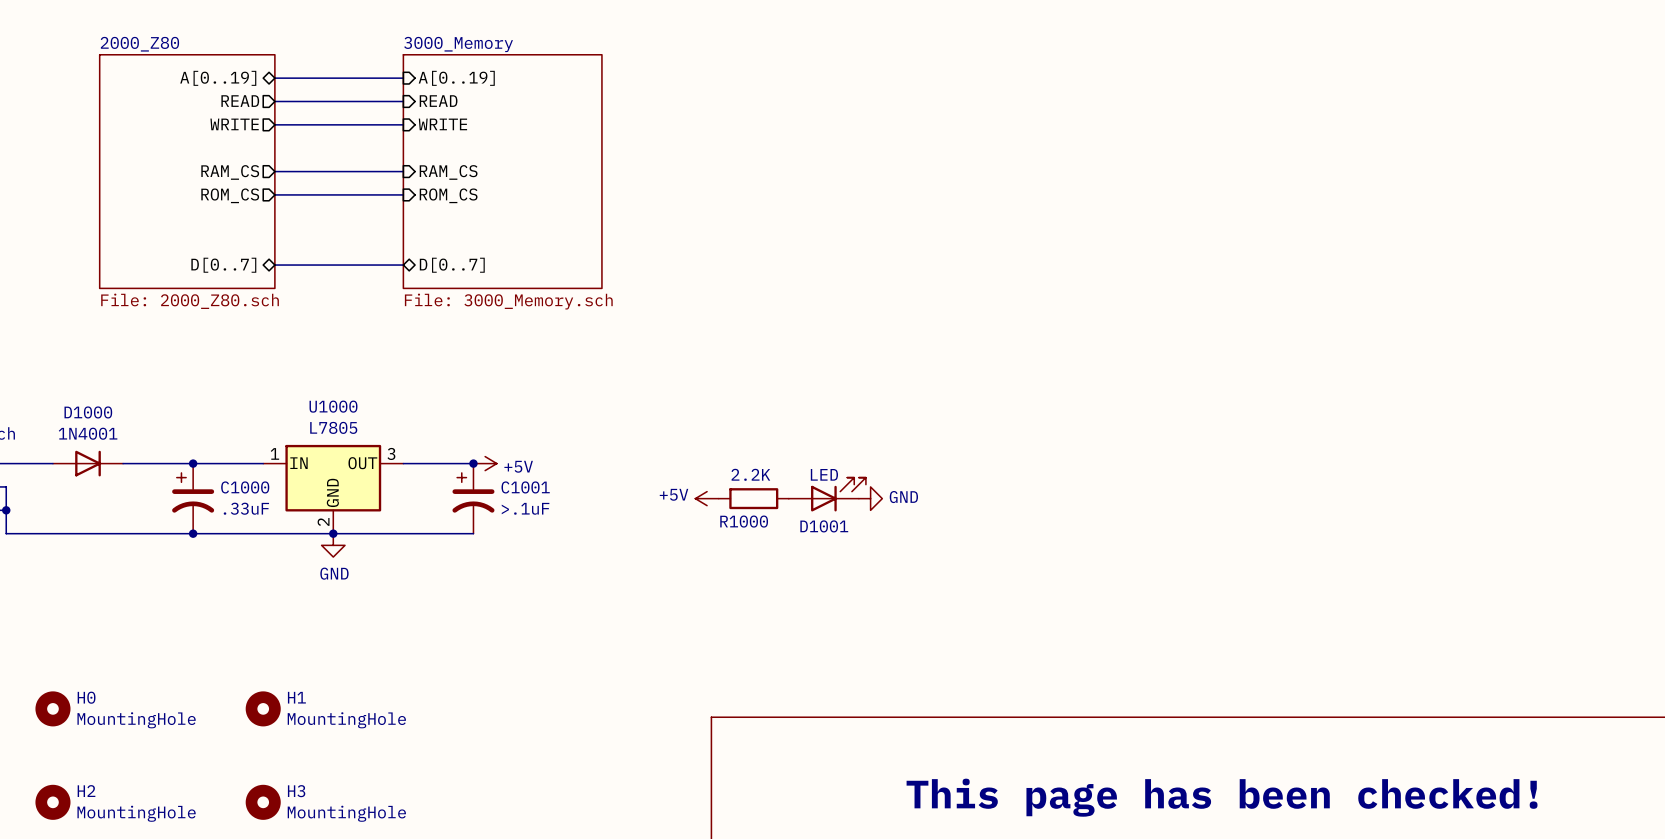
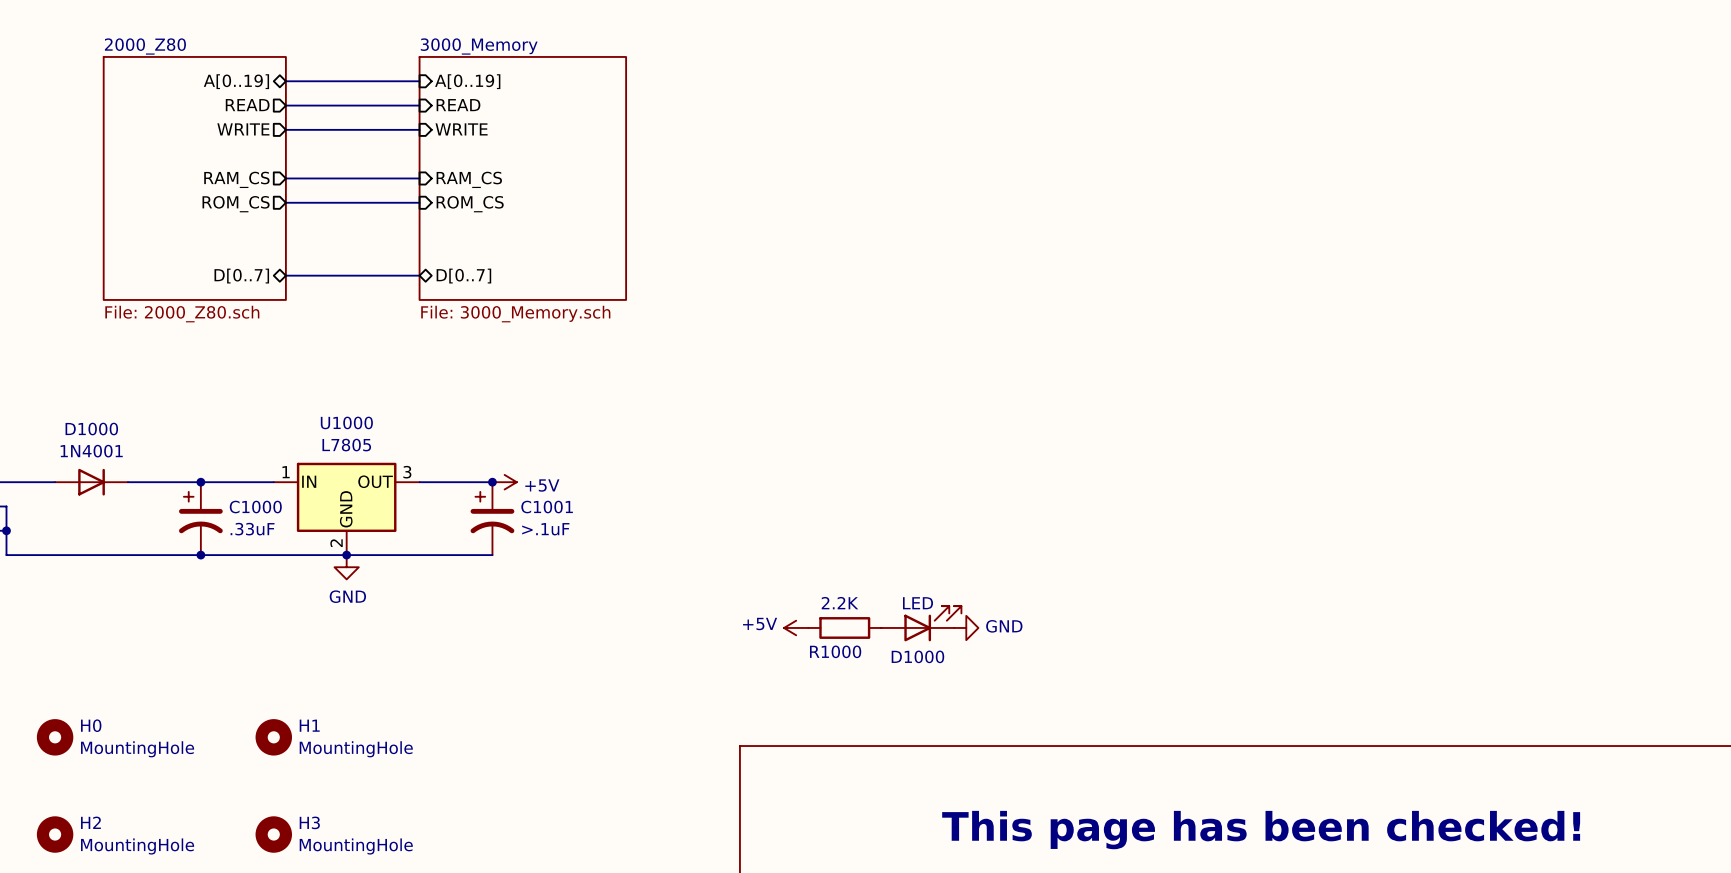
D1001: LED (827, 494) -> none
power symbol position: +5V (707, 498) -> +5V (796, 627)
R1000 position: (753, 498) -> (844, 627)
power symbol position: GND (870, 498) -> GND (966, 627)
D1000: none -> LED (921, 623)

